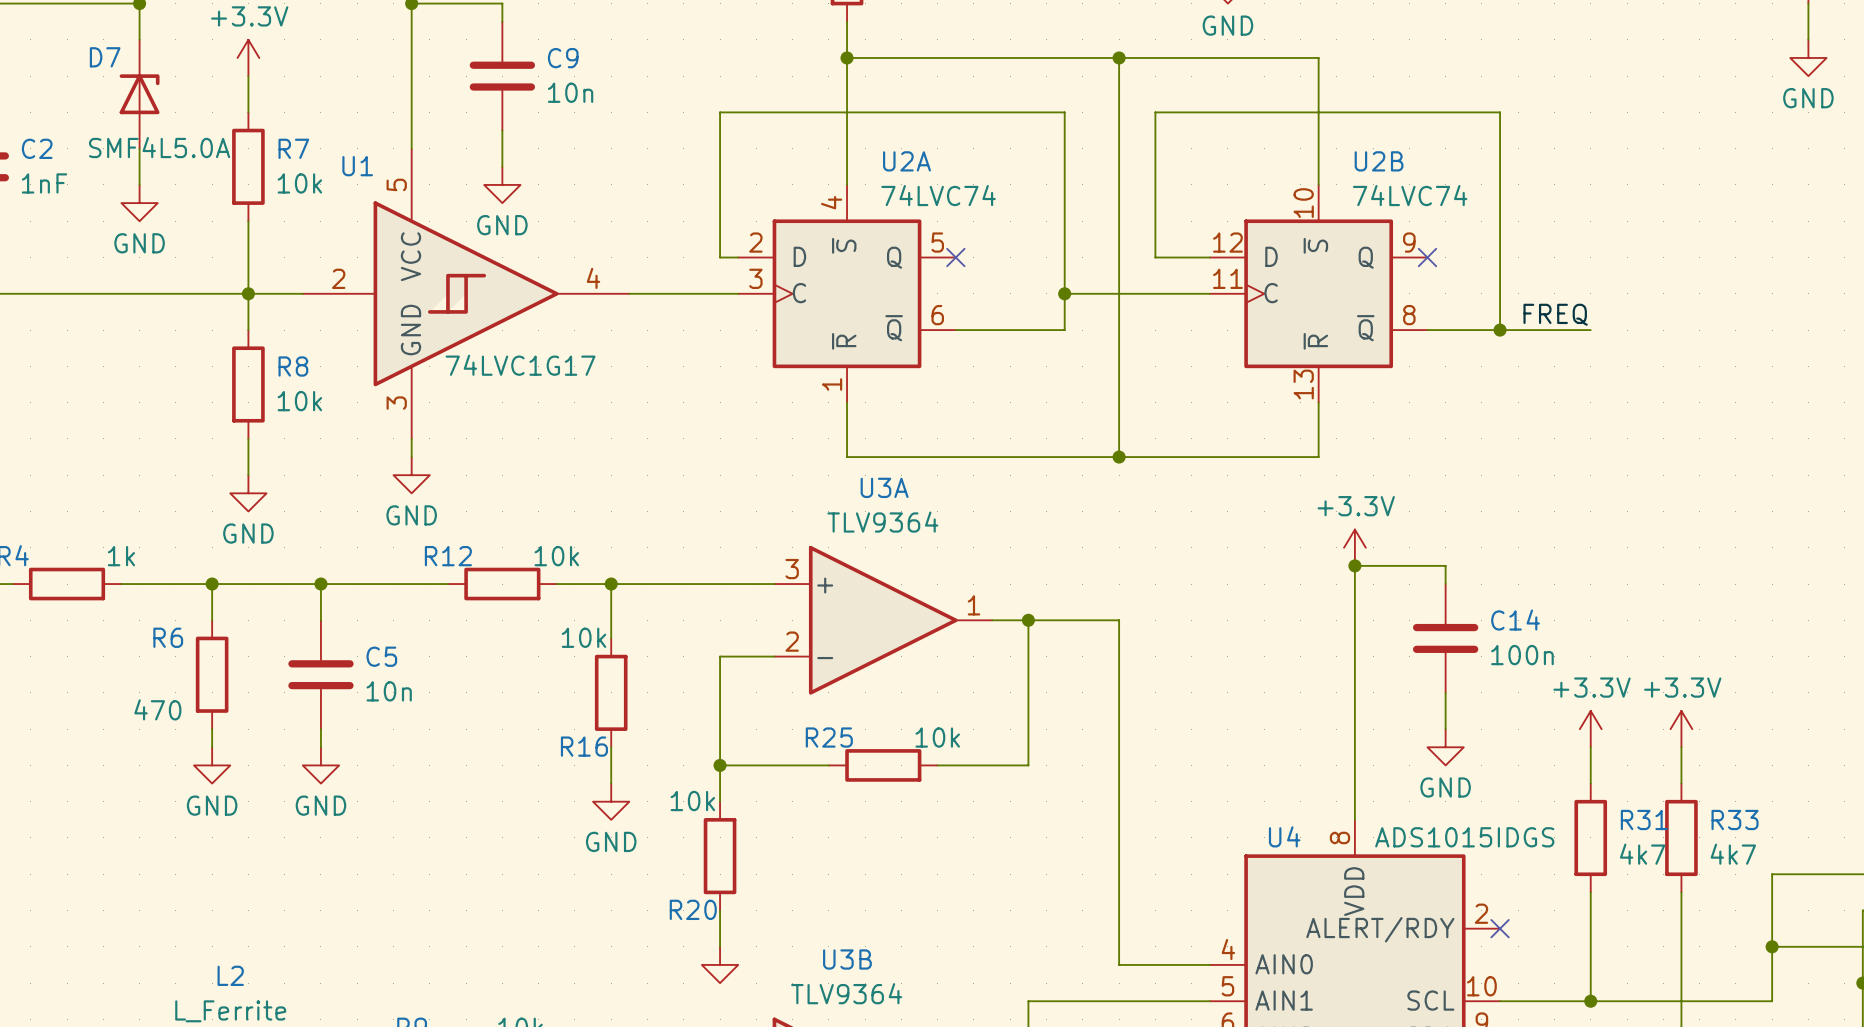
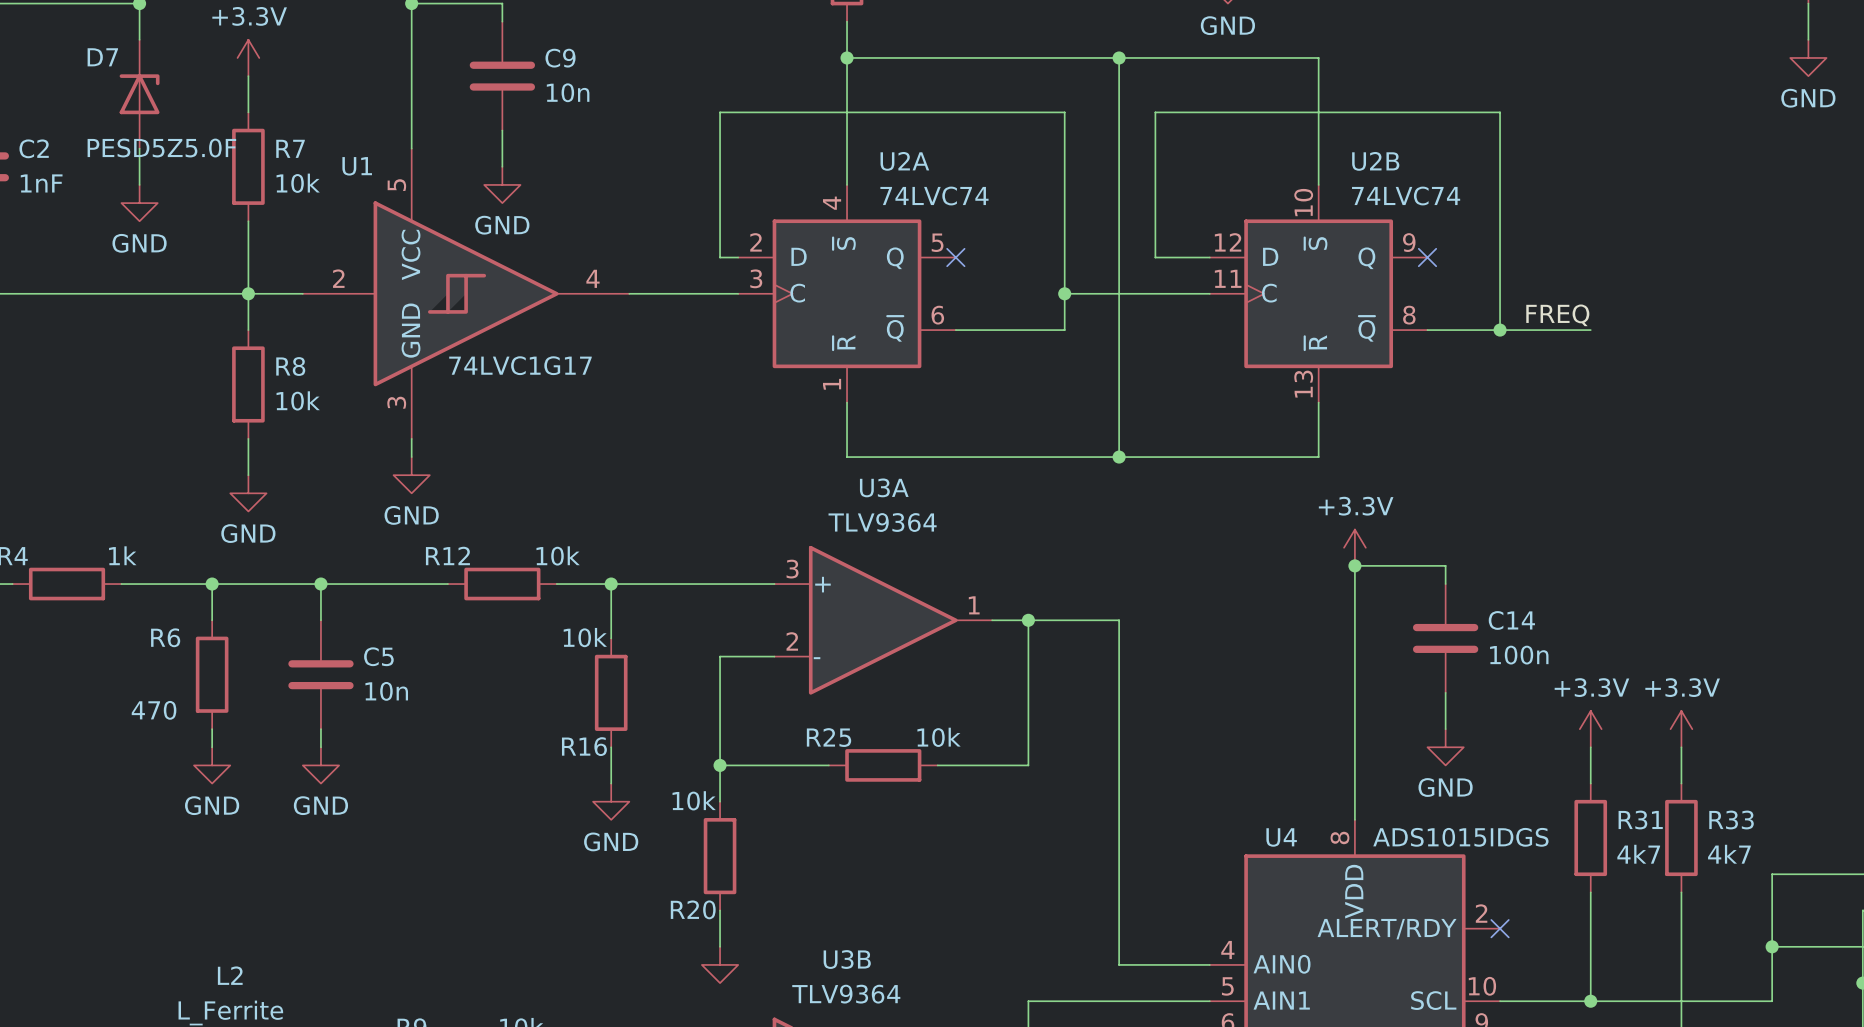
D7 value: SMF4L5.0A (159, 147) -> PESD5Z5.0F (161, 148)

